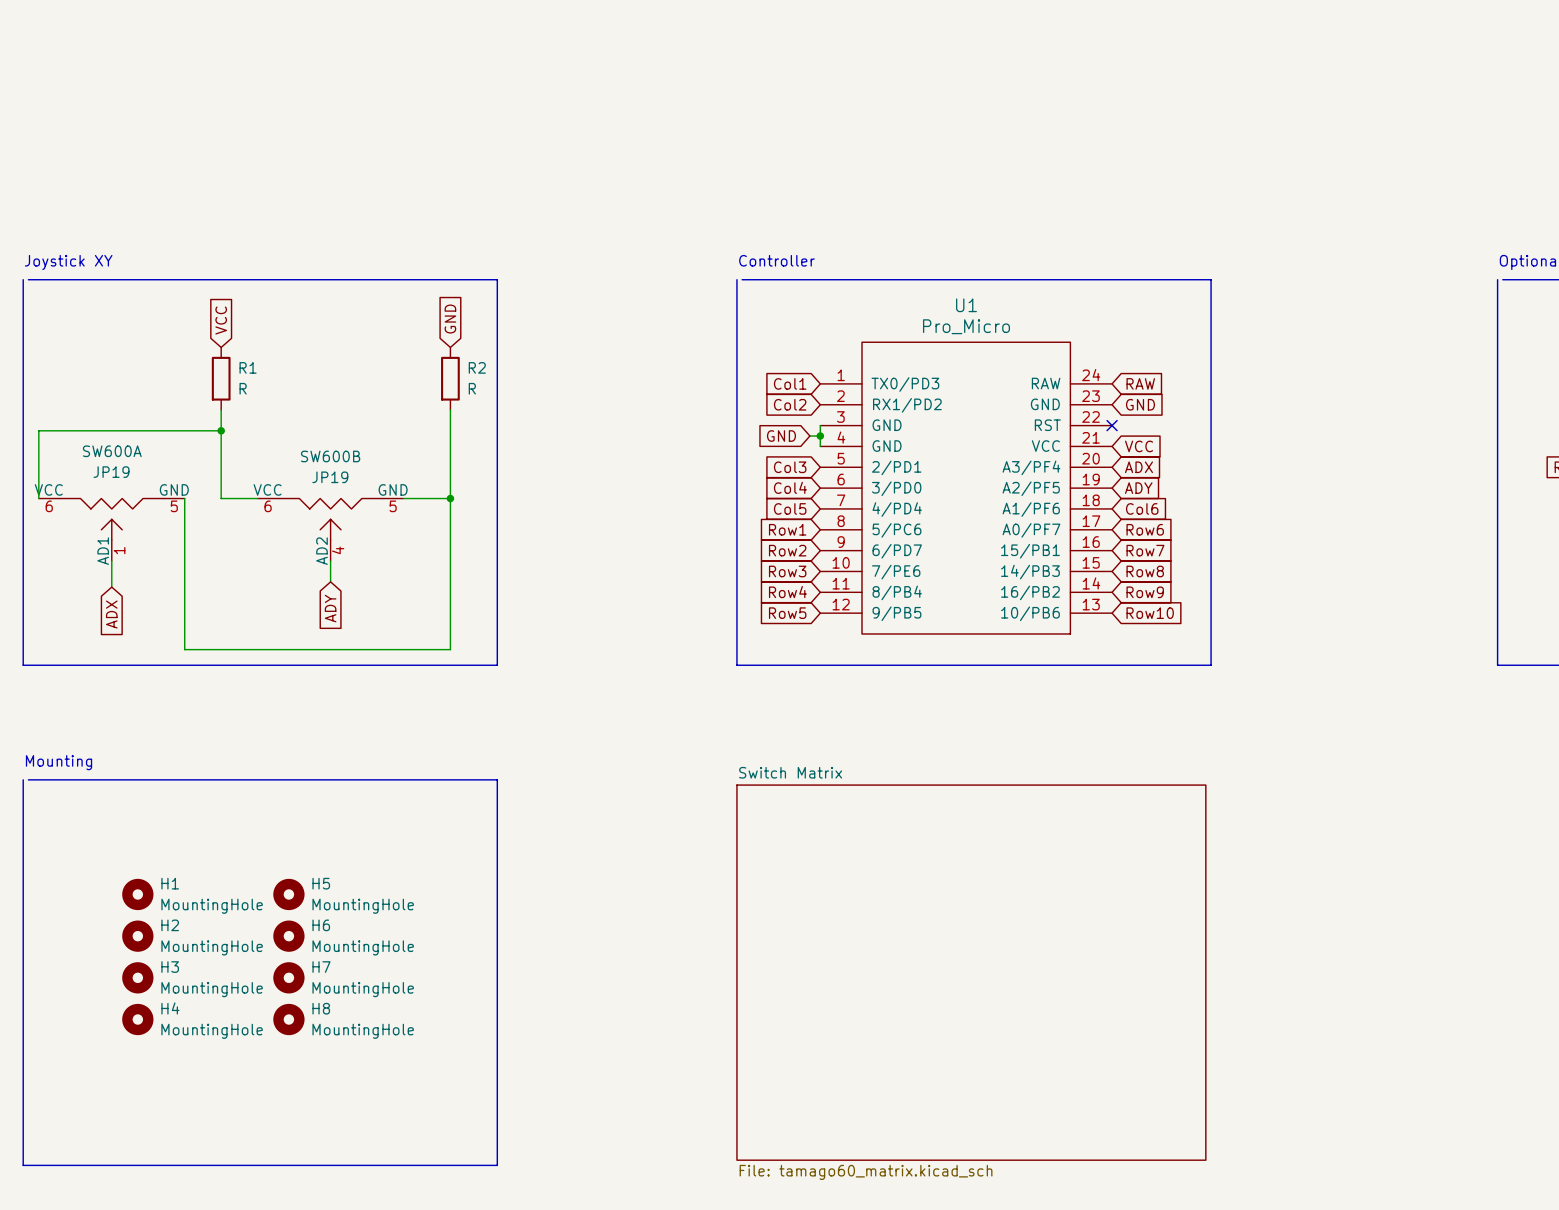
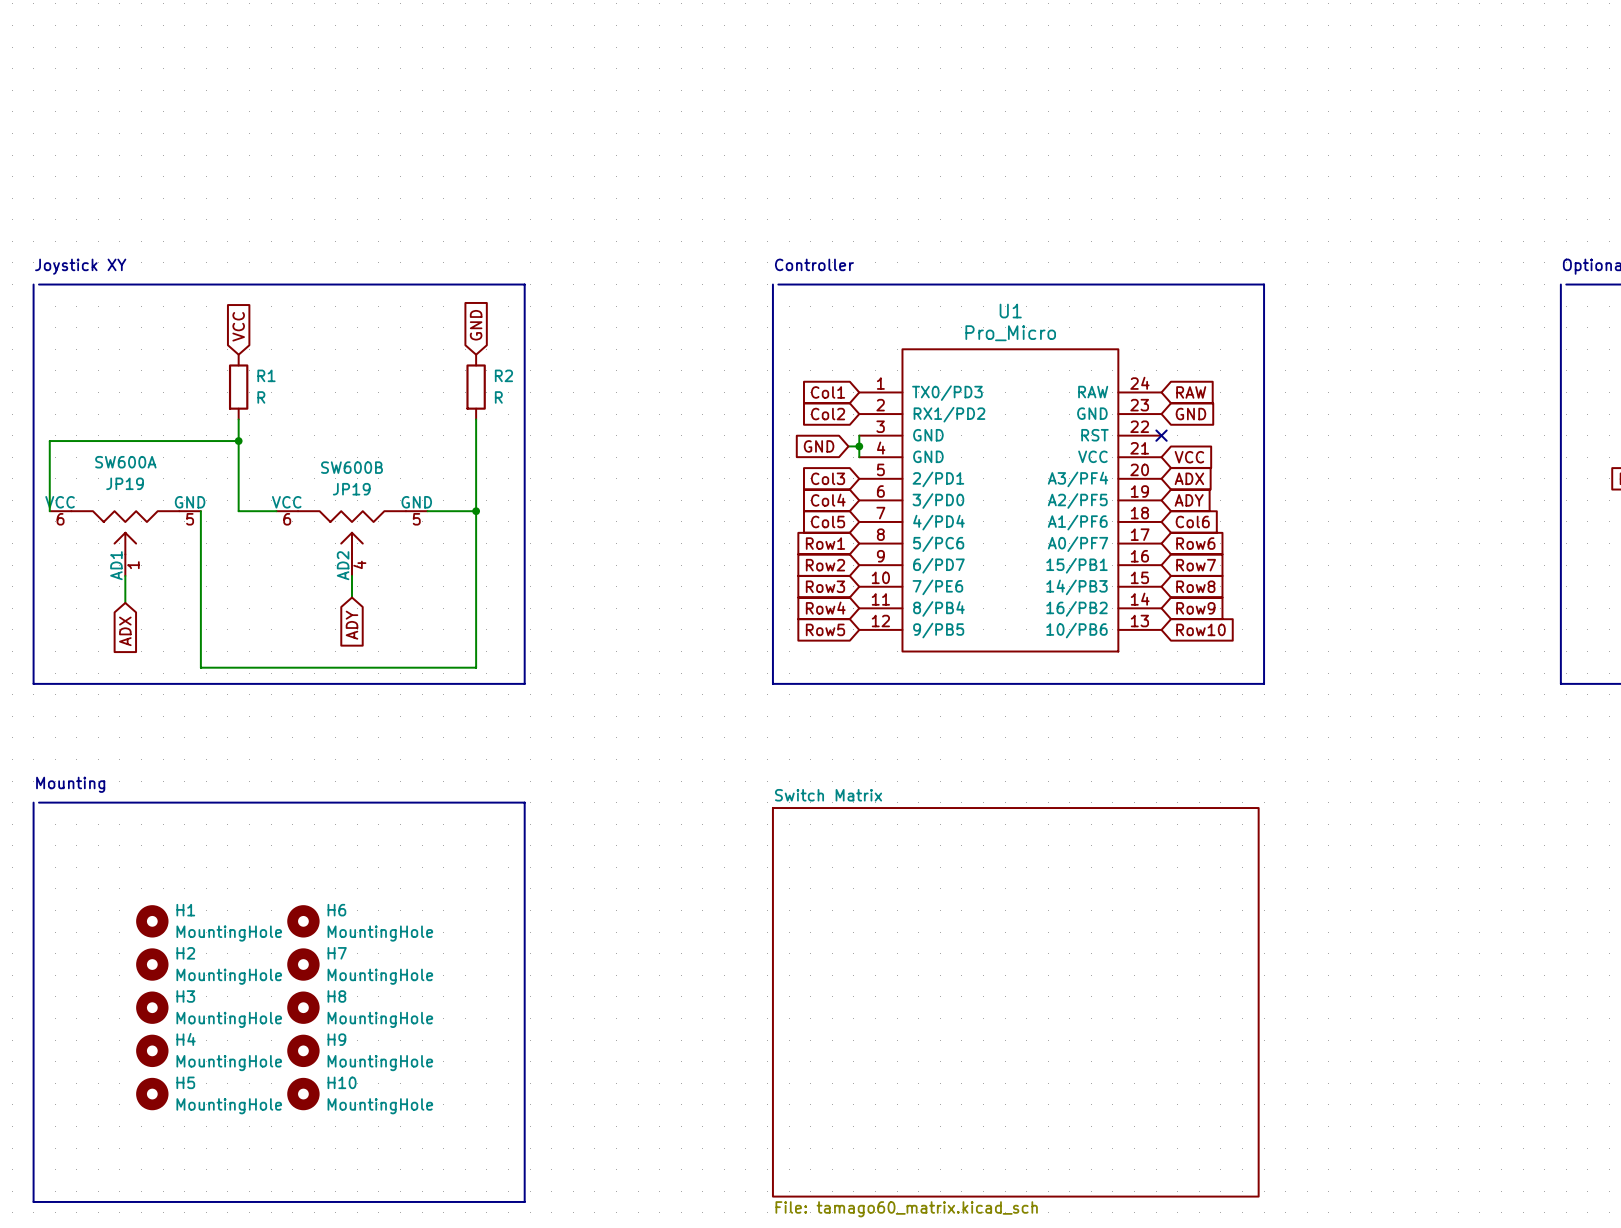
H5 position: (288, 894) -> (152, 1094)
H6 position: (288, 936) -> (303, 921)
H7 position: (288, 977) -> (303, 964)
H9: none -> MountingHole (303, 1050)
H8 position: (288, 1019) -> (303, 1007)
H10: none -> MountingHole (303, 1094)

